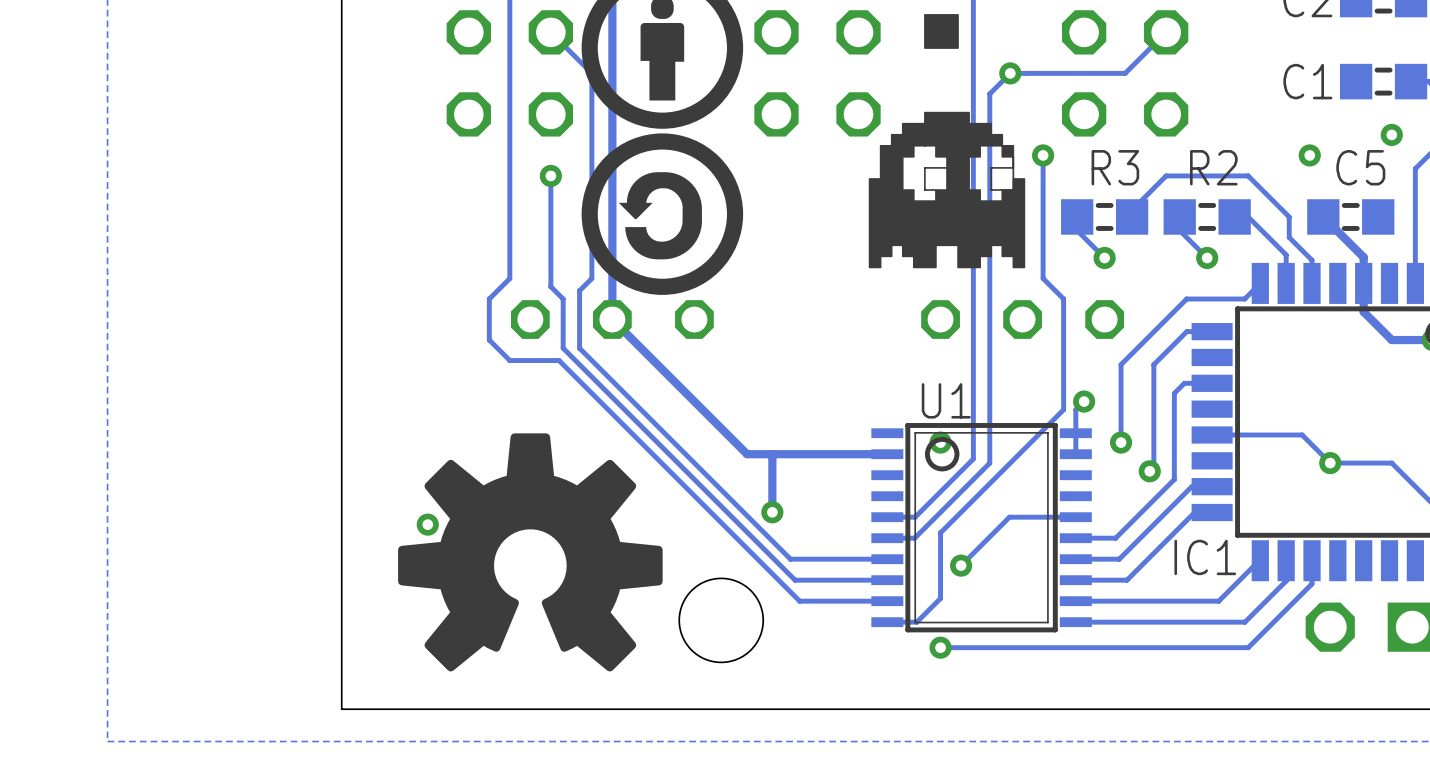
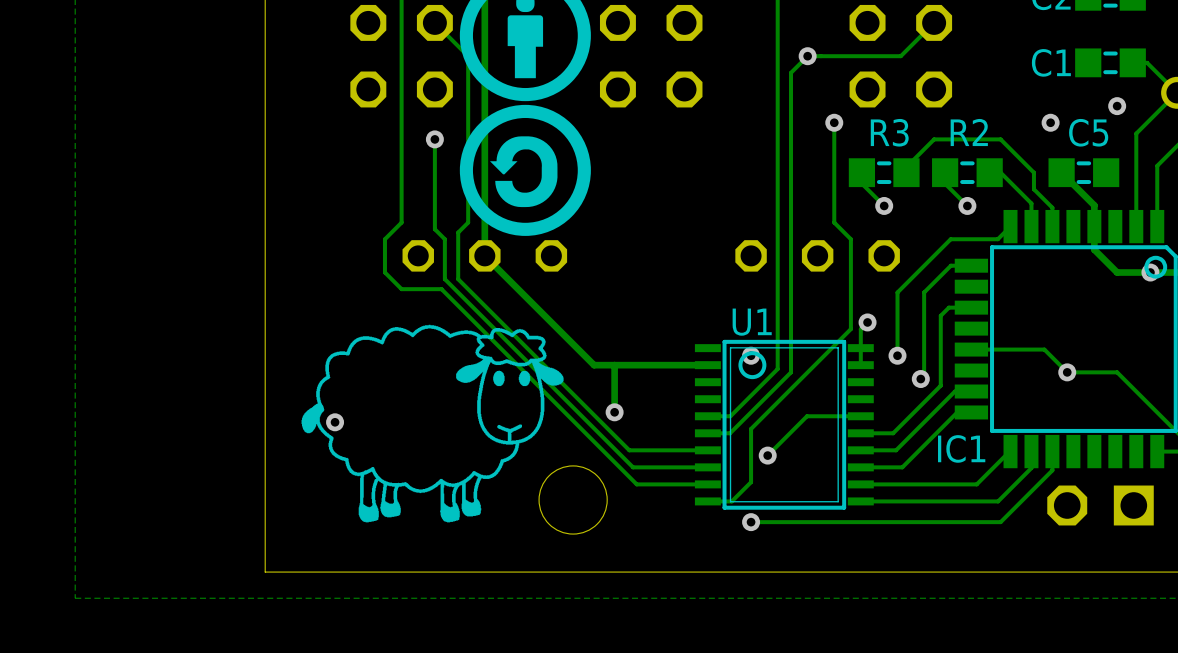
drawing: [924, 14, 959, 49] -> none
drawing: [868, 111, 1026, 269] -> none
drawing shape: [398, 433, 663, 672] -> [301, 324, 564, 523]

